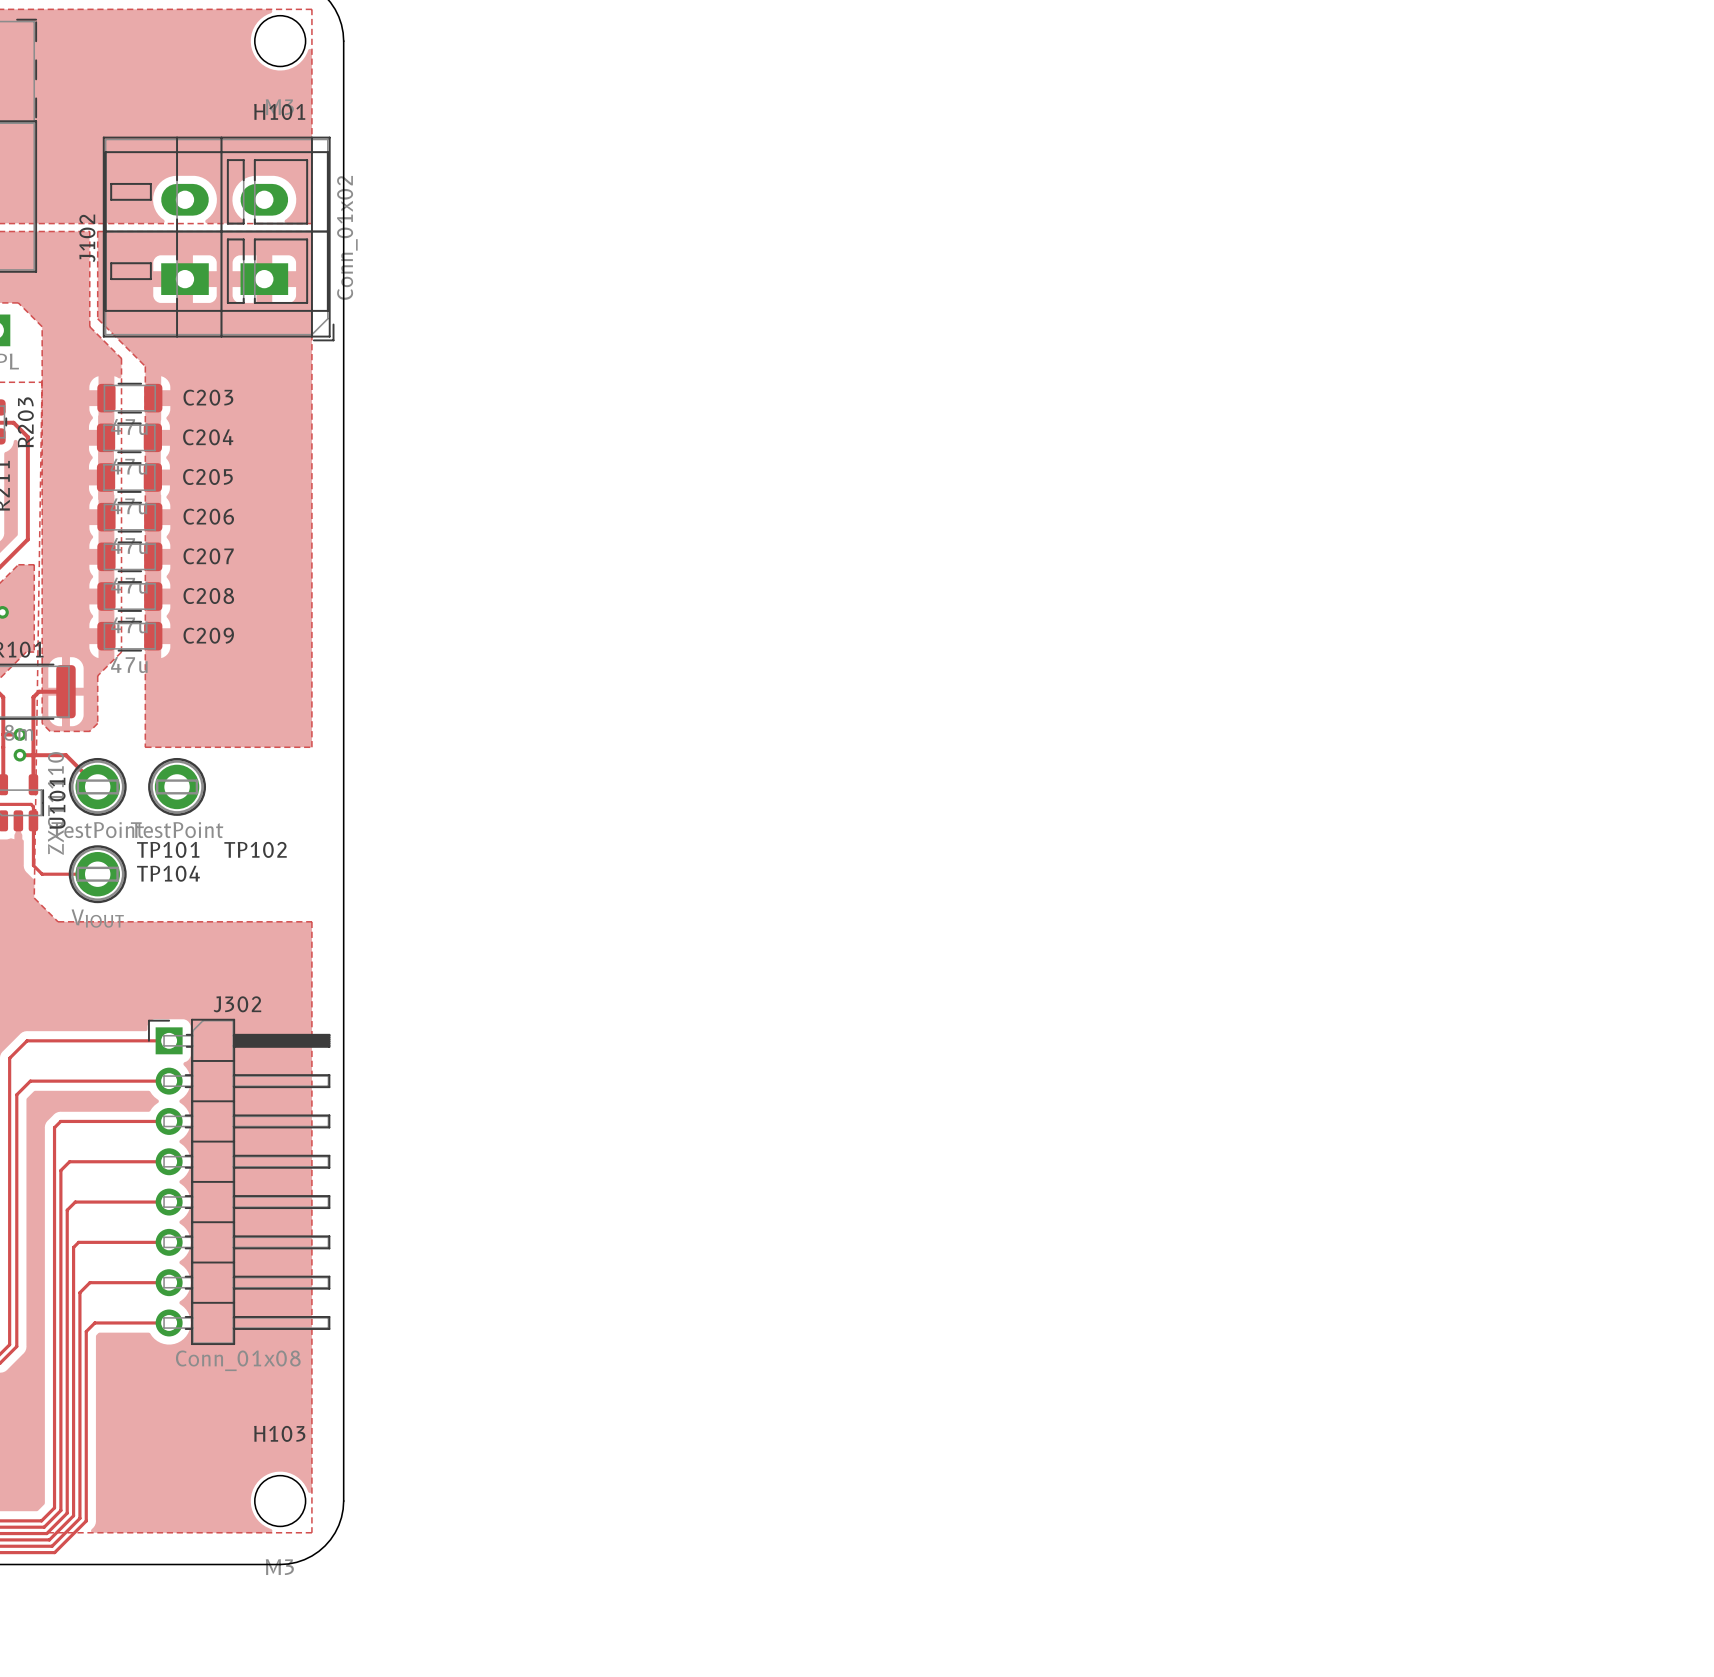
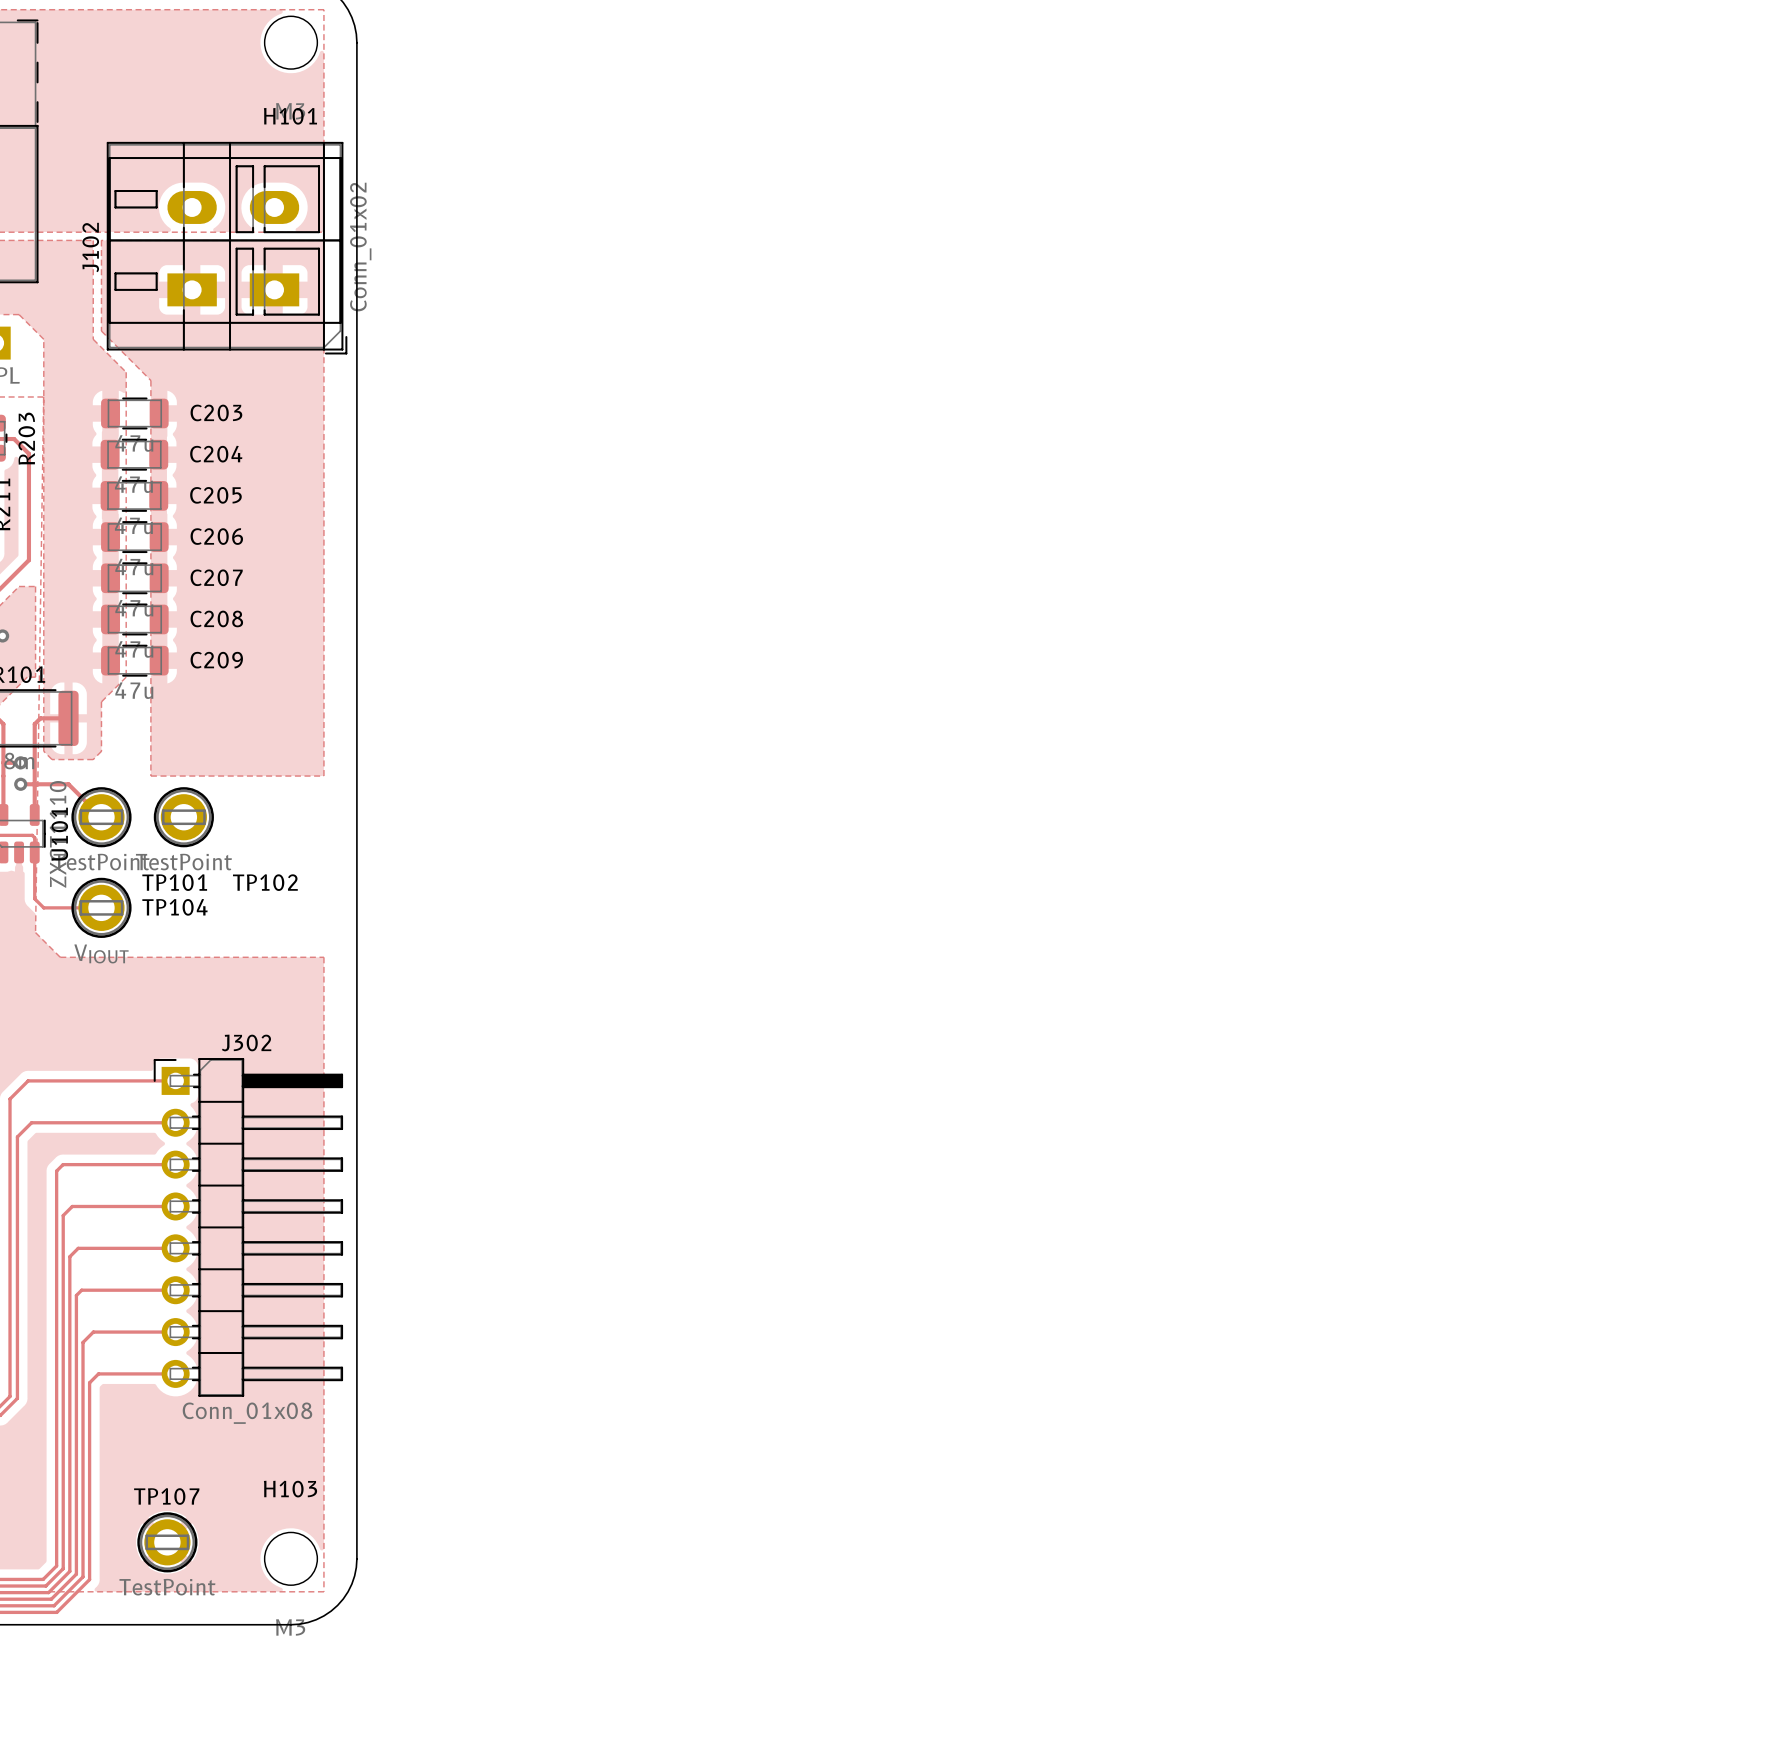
TP107: none -> TestPoint (167, 1542)

